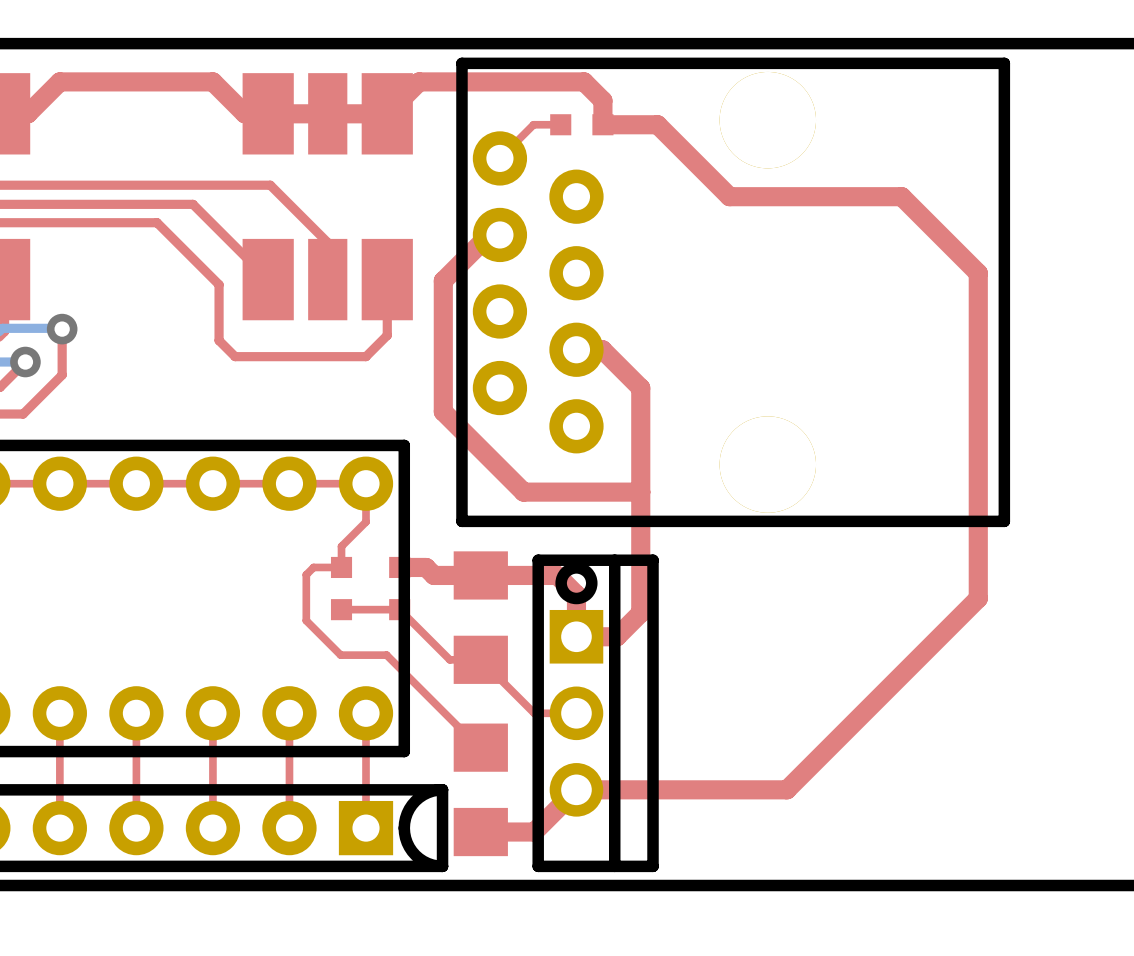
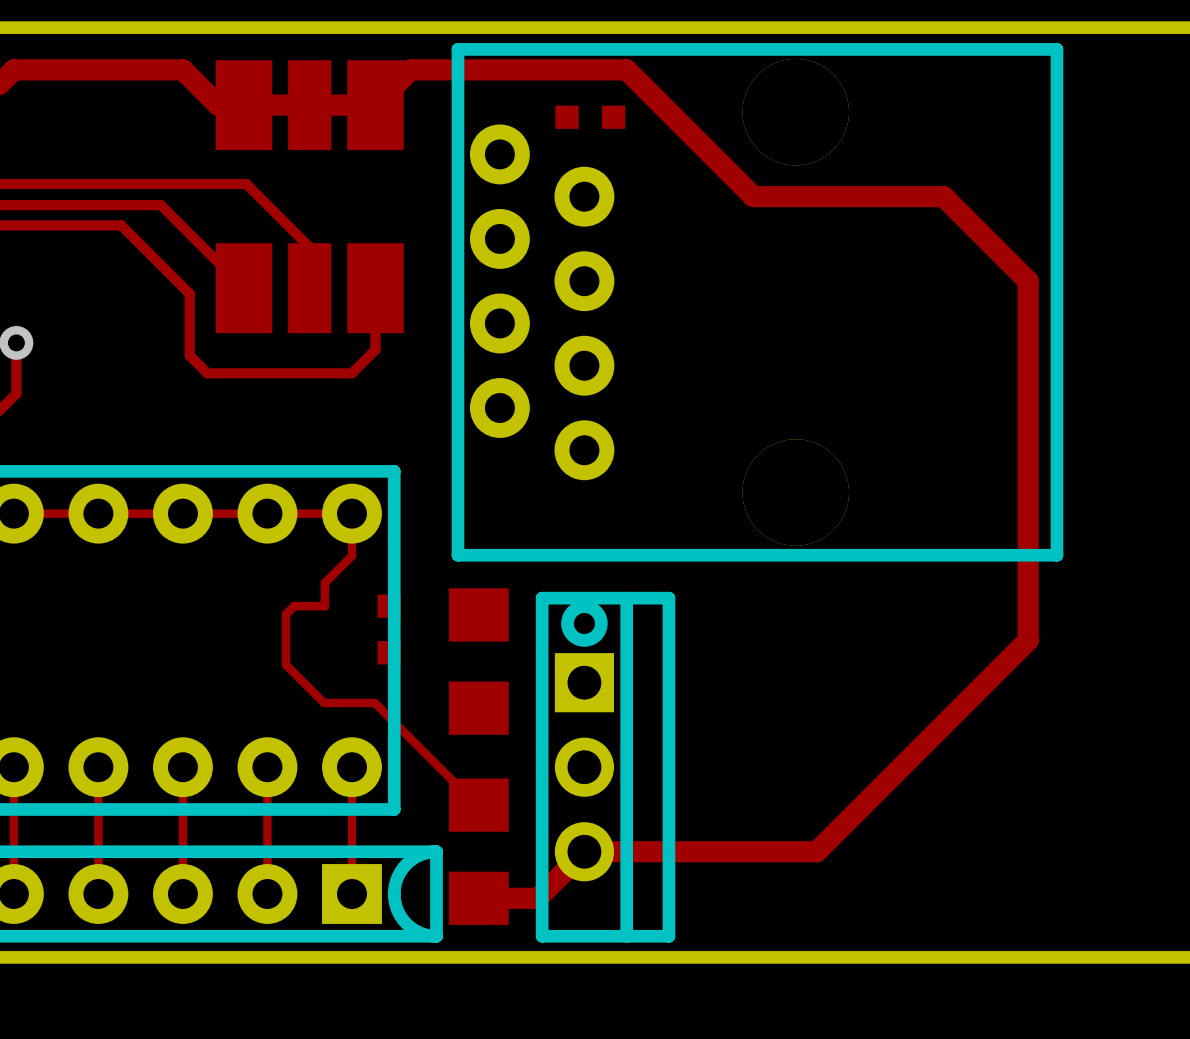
top track: (584, 81) (602, 100) (602, 124) (657, 124) -> (592, 69) (626, 69) (674, 117)
top track: (560, 124) (533, 124) (499, 158) -> none
top track: (499, 234) (489, 234) (443, 280) (443, 411) (523, 492) (640, 492) -> none
top track: (576, 349) (602, 349) (640, 388) (640, 613) (617, 636) (576, 636) (576, 594) (557, 575) (434, 575) (426, 567) (399, 567) -> none
part: (341, 588) -> none
top track: (341, 609) (399, 609) (449, 659) (480, 659) (534, 713) (576, 713) -> none

